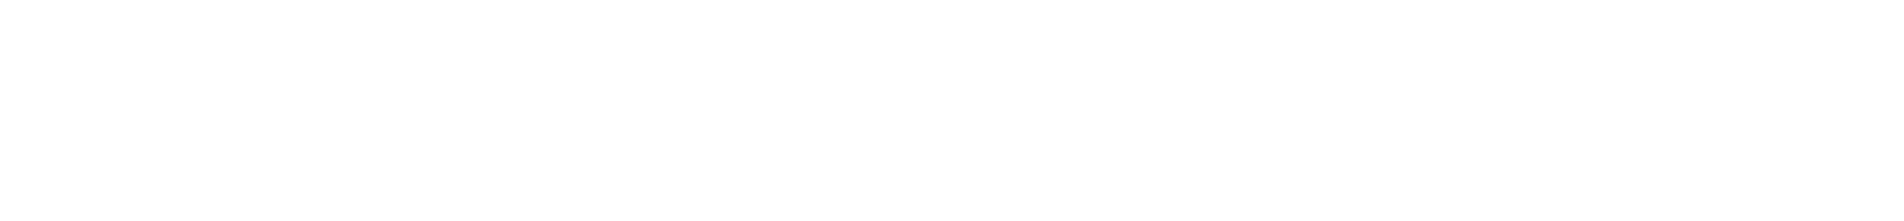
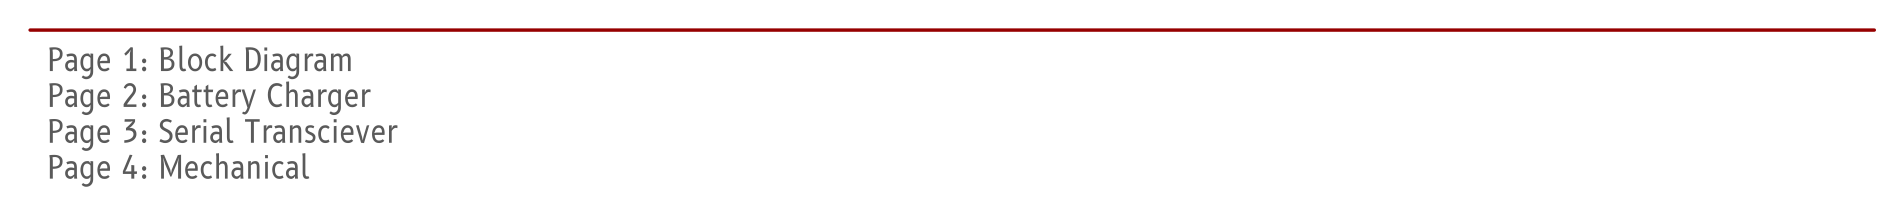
line: none -> (30, 30) (1874, 30)
text: none -> Page 1: Block Diagram (199, 62)
text: none -> Page 2: Battery Charger (209, 98)
text: none -> Page 3: Serial Transciever (223, 134)
text: none -> Page 4: Mechanical (179, 169)

